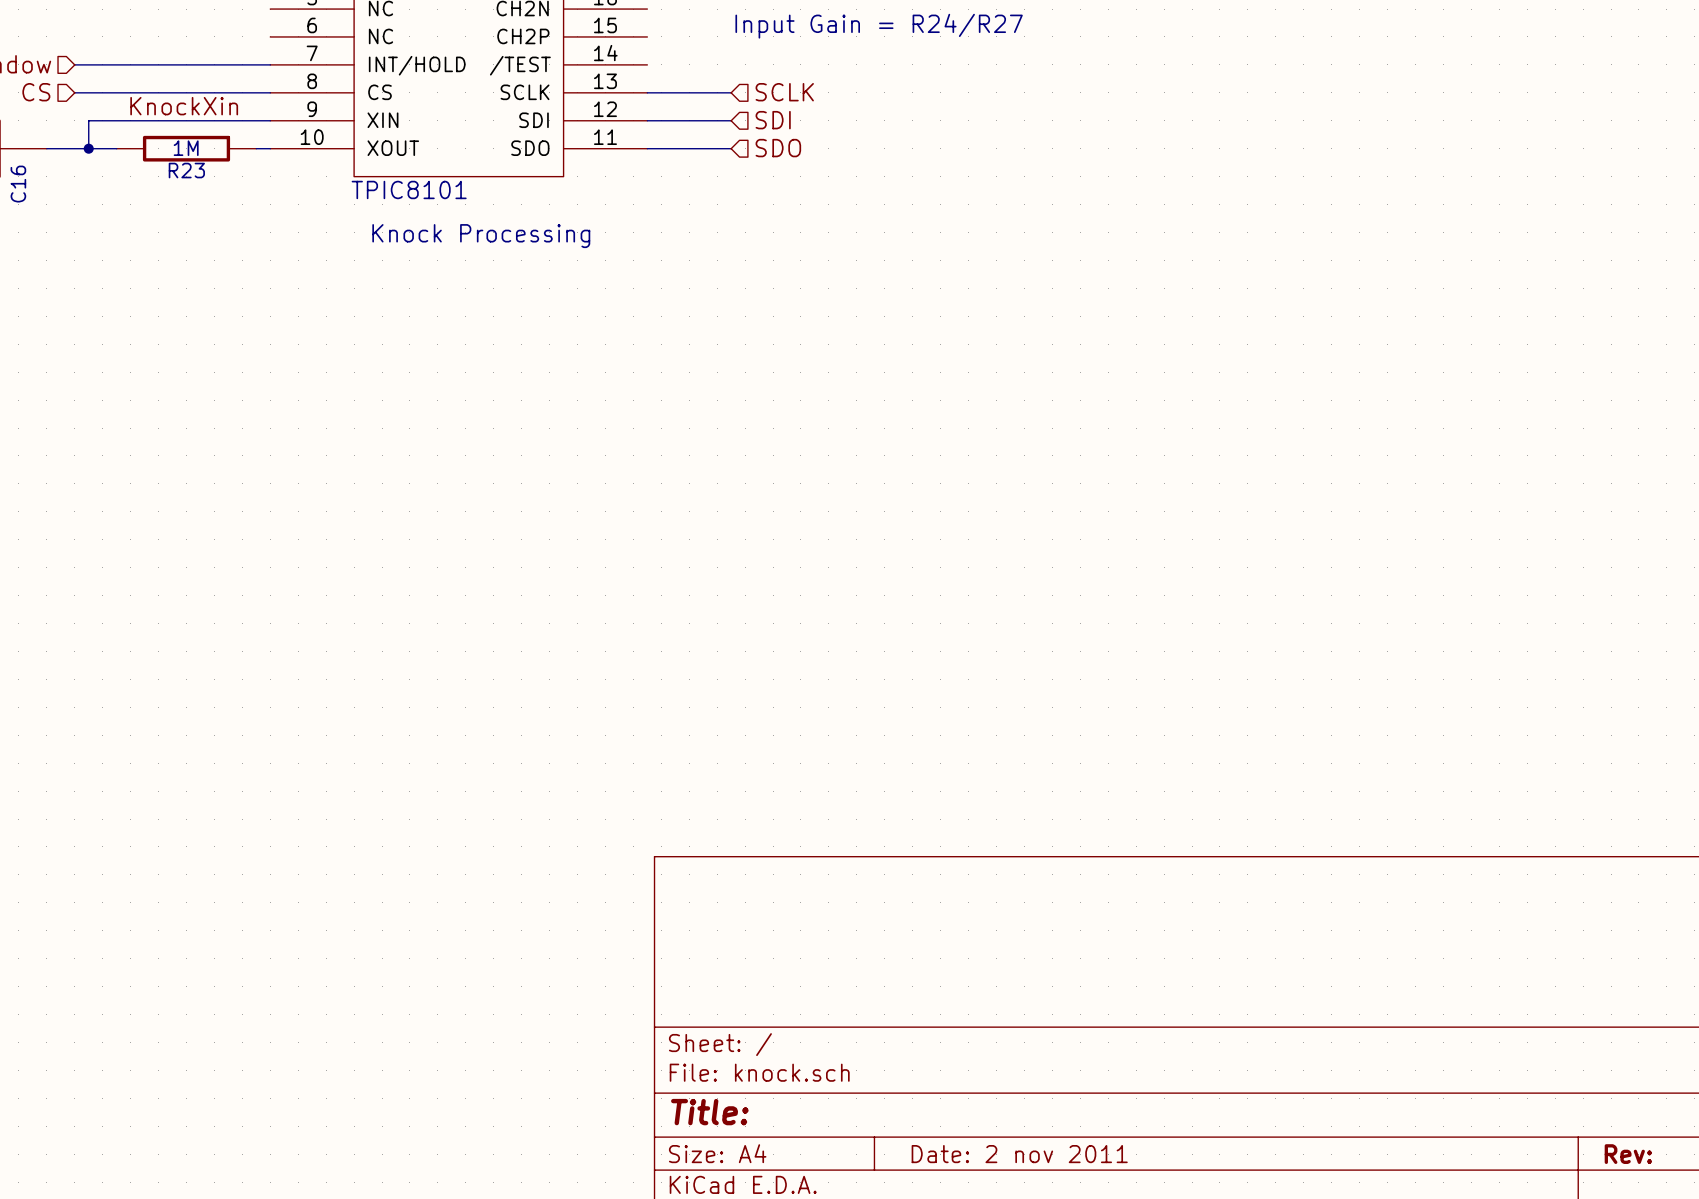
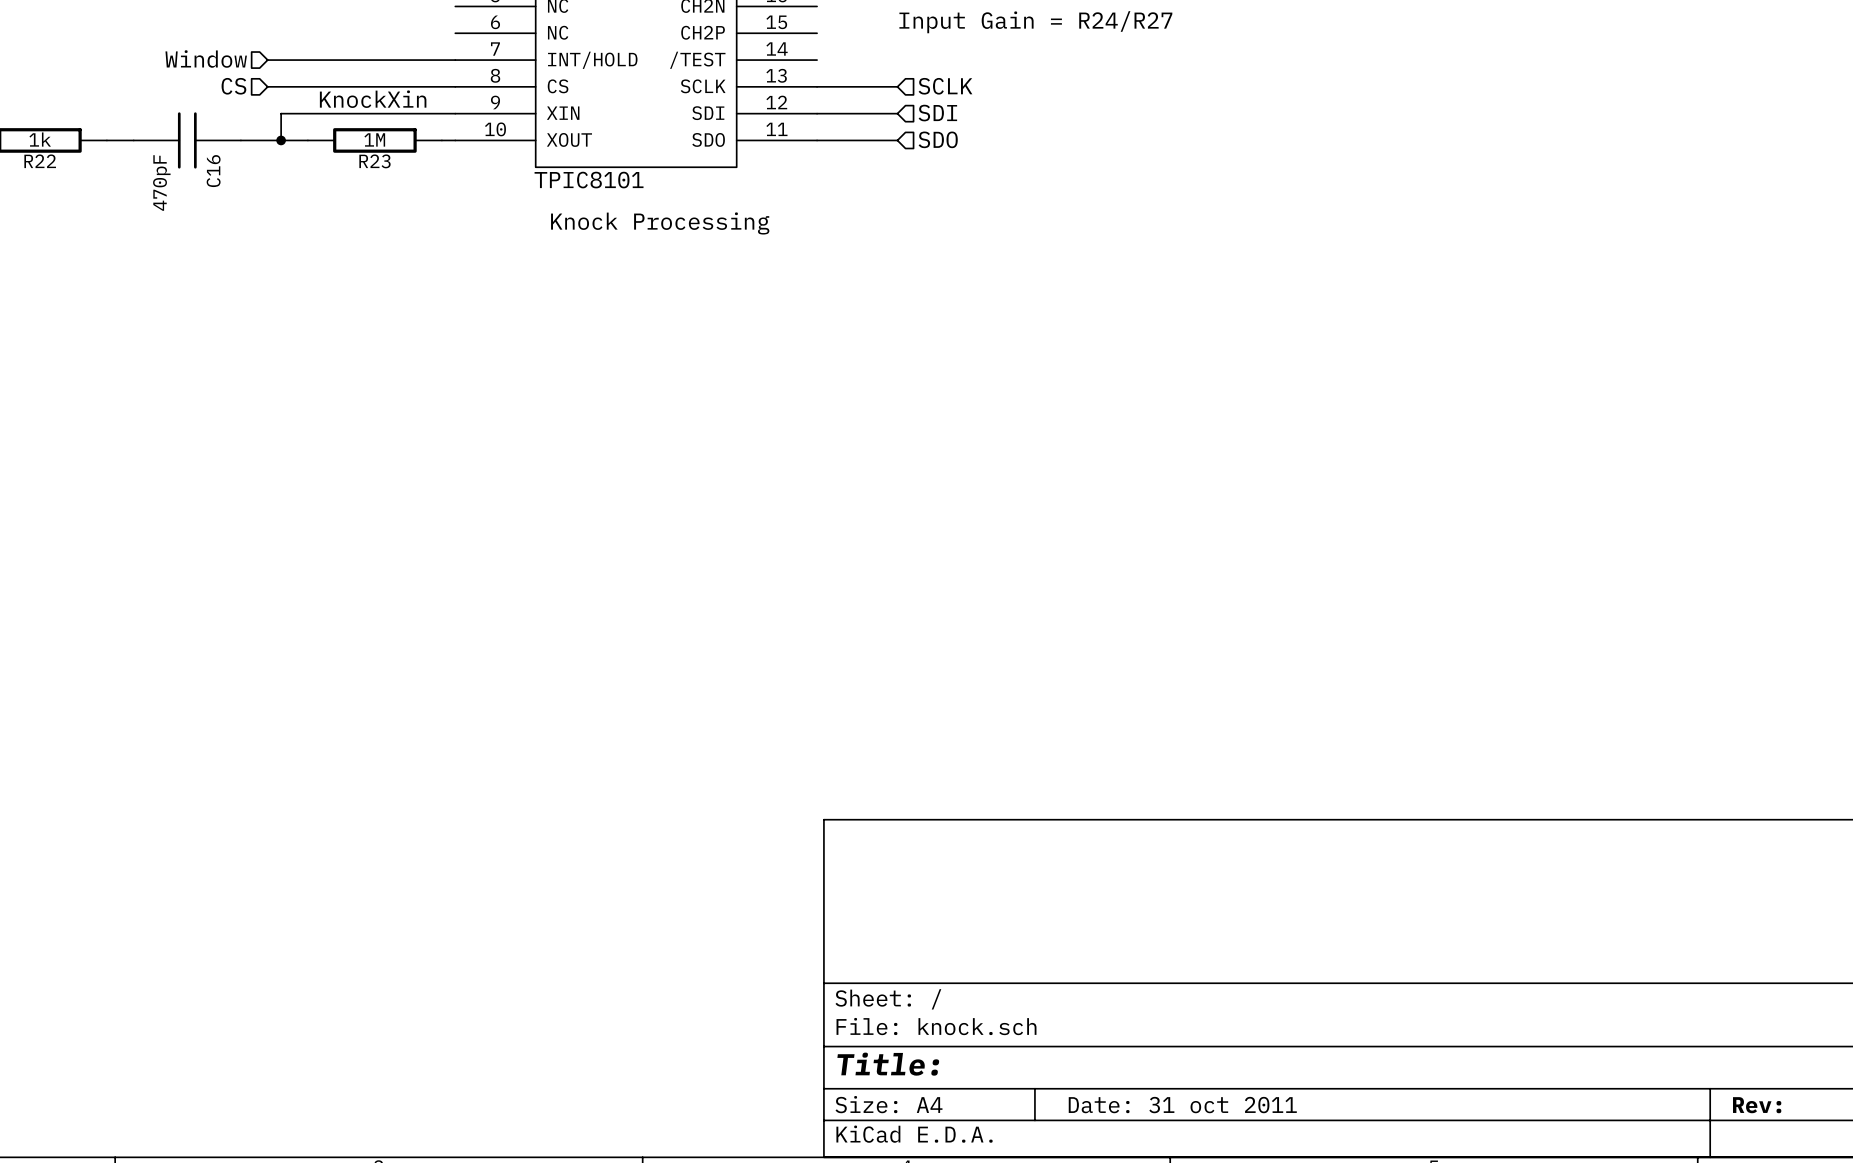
title block: Date: 2 nov 2011 (1019, 1154) -> Date: 31 oct 2011 (1182, 1105)

